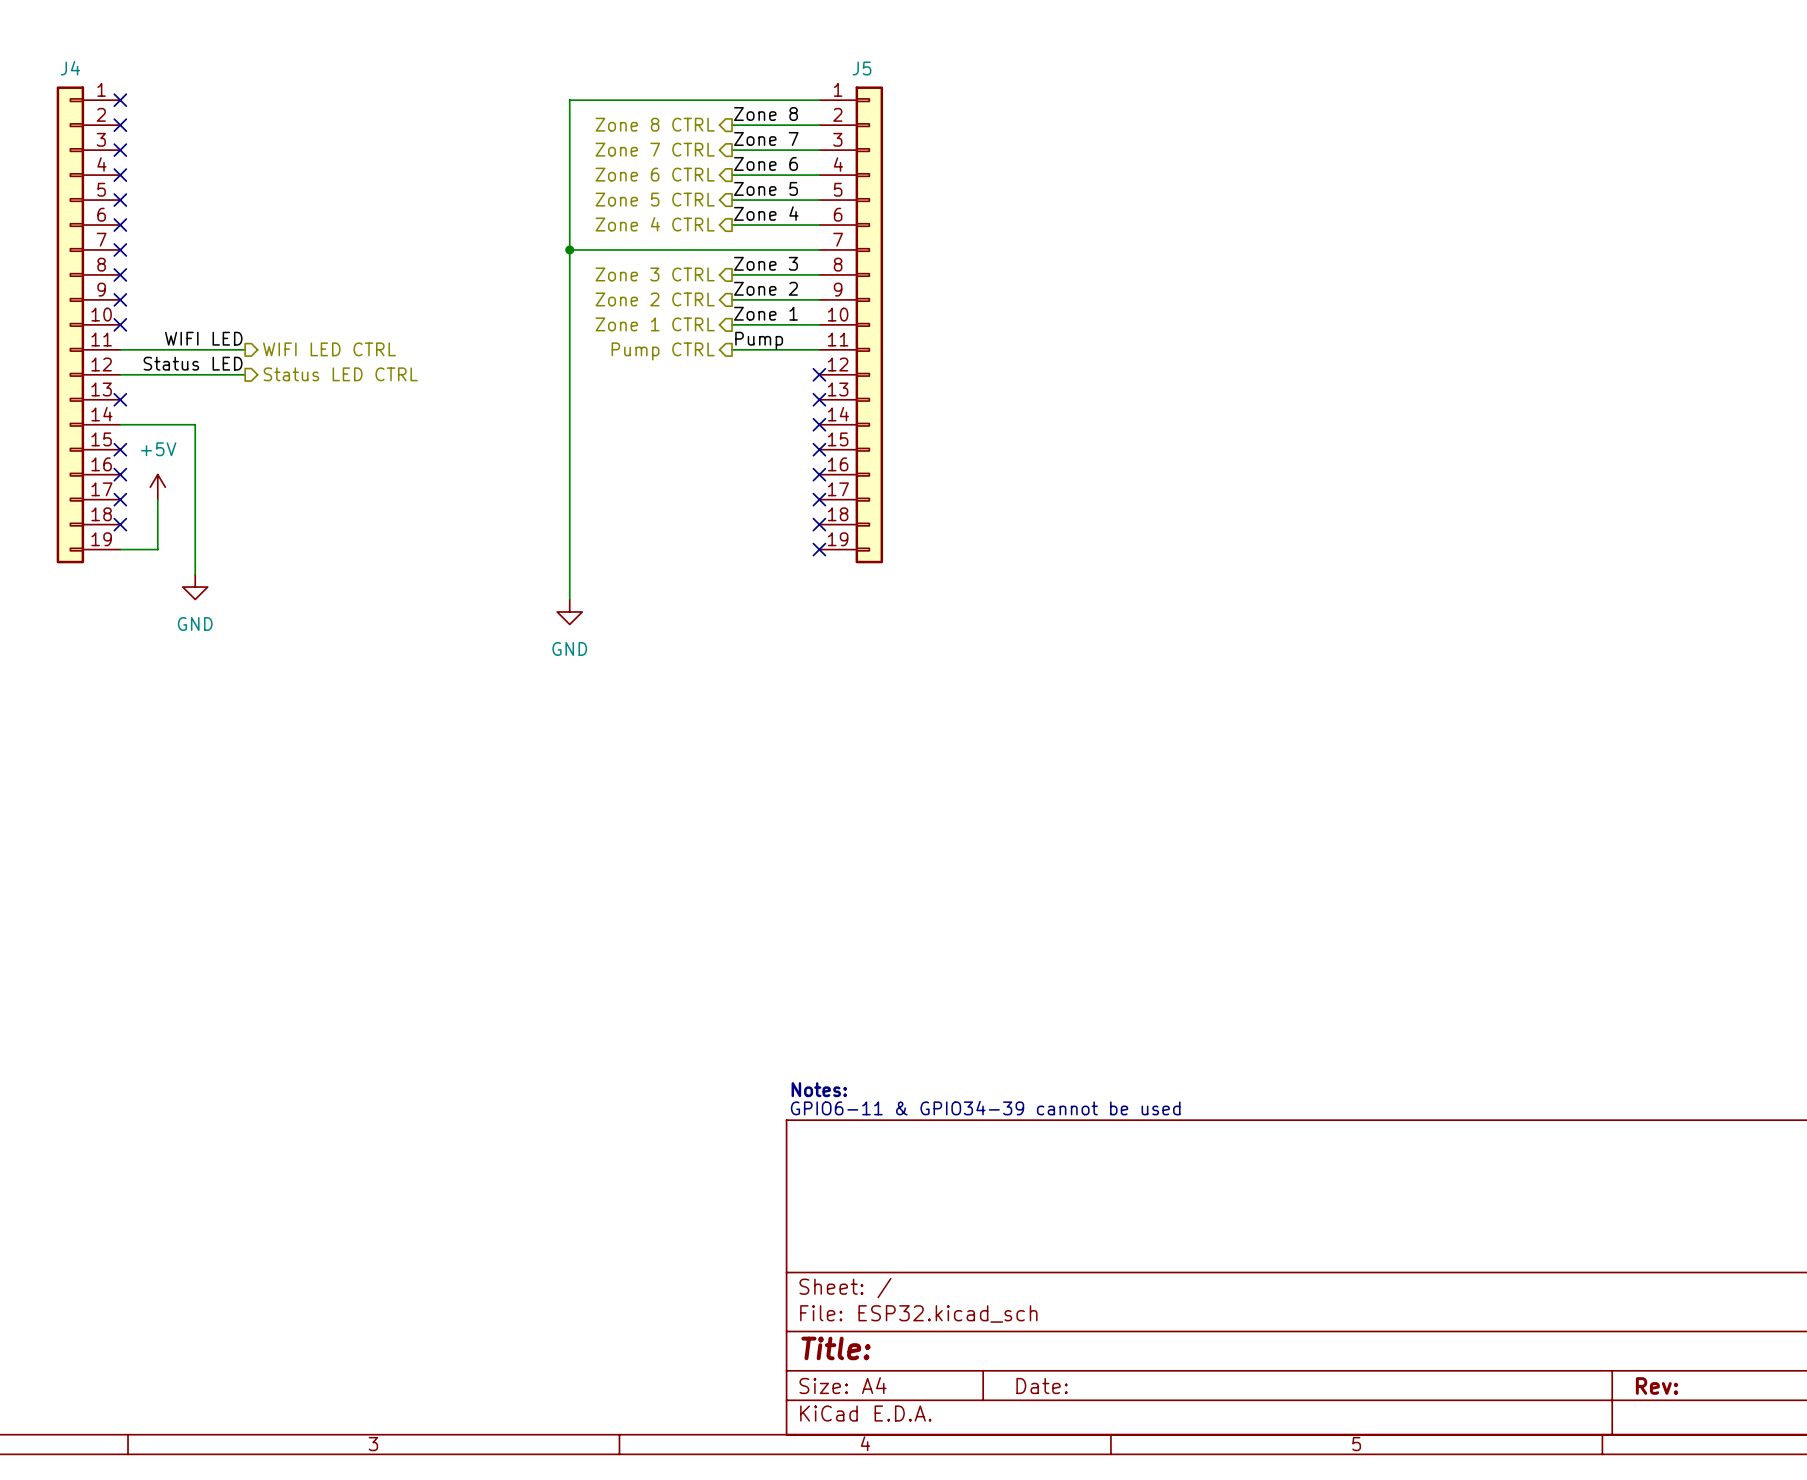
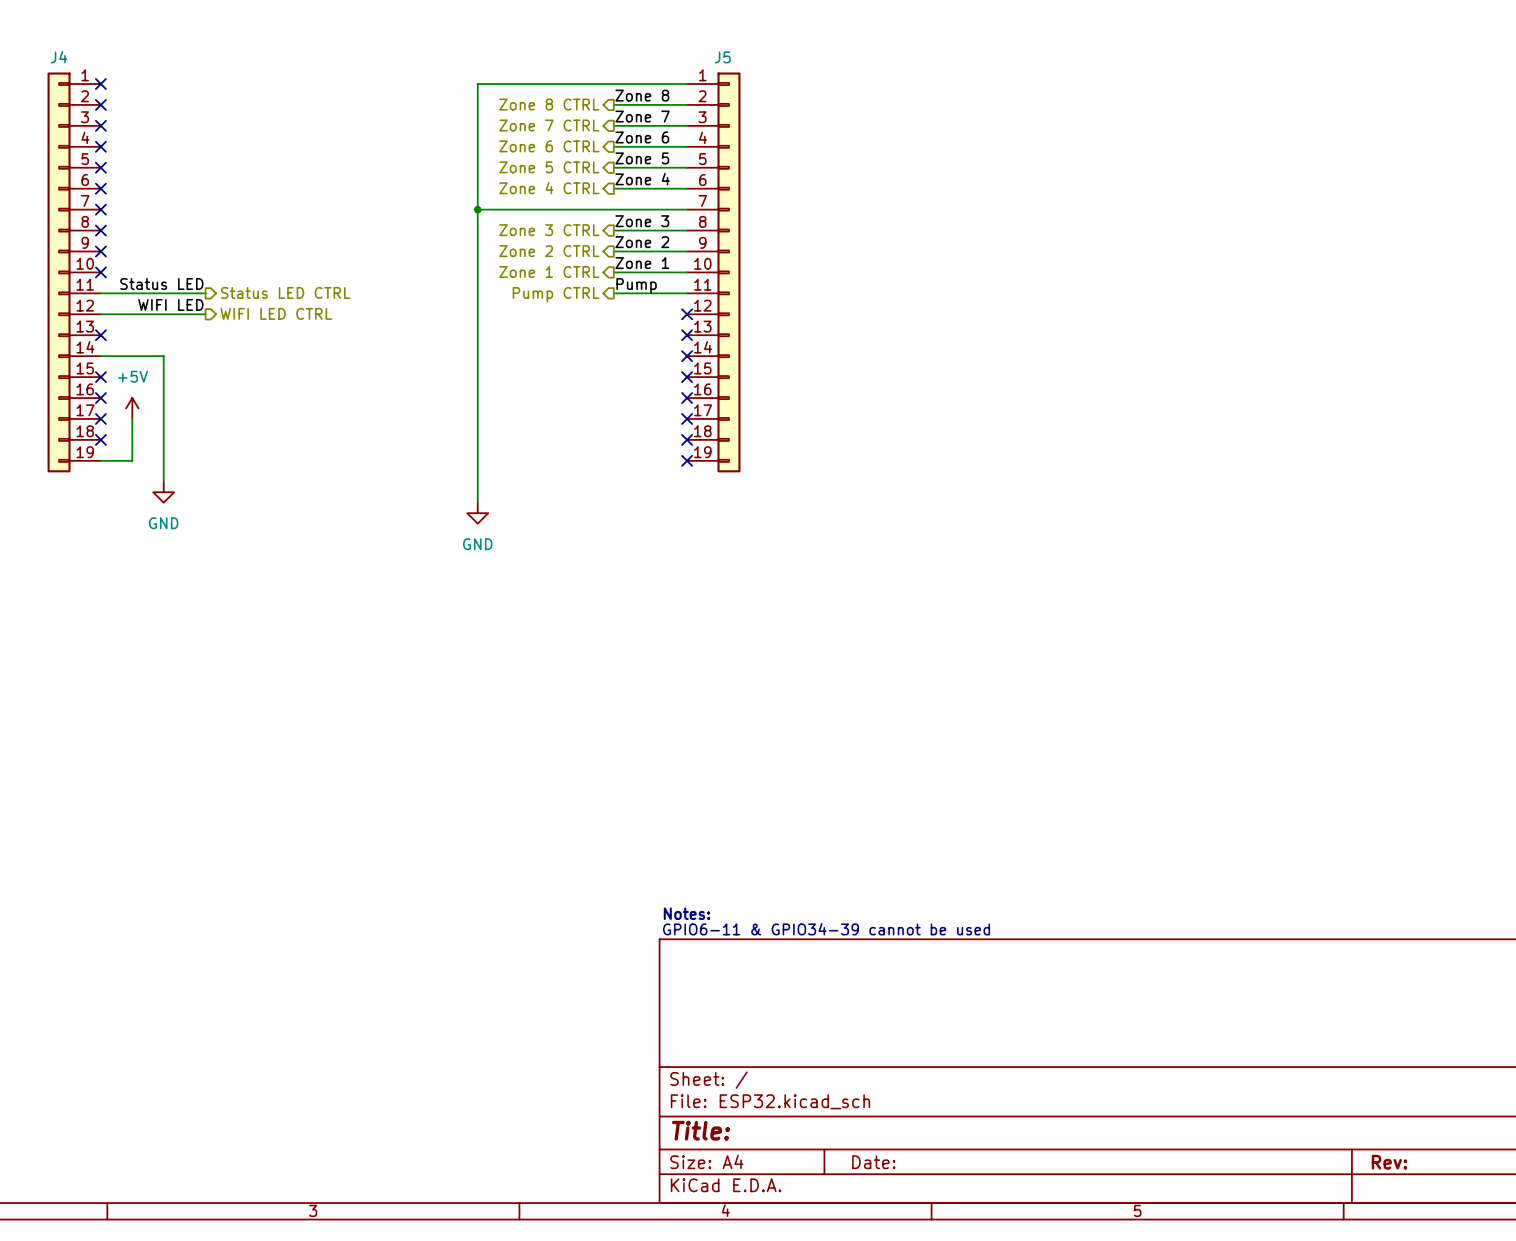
label: WIFI LED (203, 338) -> Status LED (161, 284)
hierarchical label: WIFI LED CTRL (329, 349) -> Status LED CTRL (285, 292)
label: Status LED (193, 363) -> WIFI LED (170, 304)
hierarchical label: Status LED CTRL (340, 374) -> WIFI LED CTRL (276, 313)

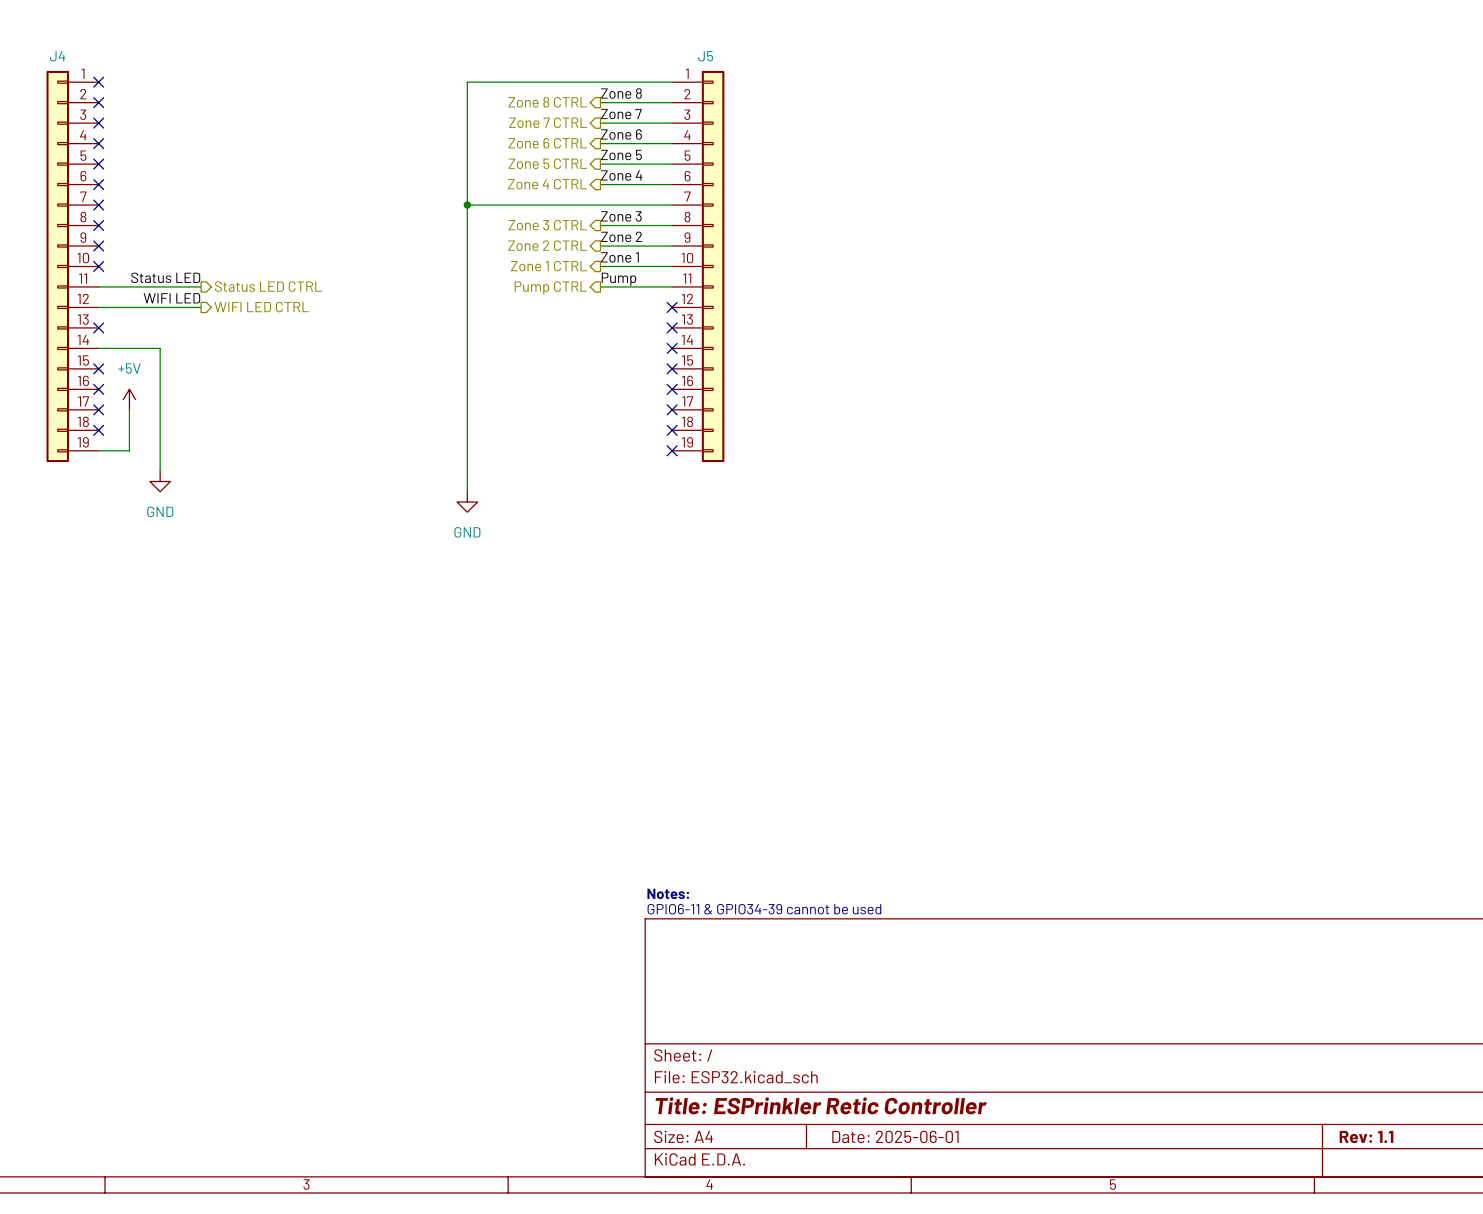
title block: Title: (701, 1130) -> Title: ESPrinkler Retic Controller (821, 1105)
title block: Date: (873, 1162) -> Date: 2025-06-01 (895, 1136)
title block: Rev: (1389, 1162) -> Rev: 1.1 (1366, 1136)

